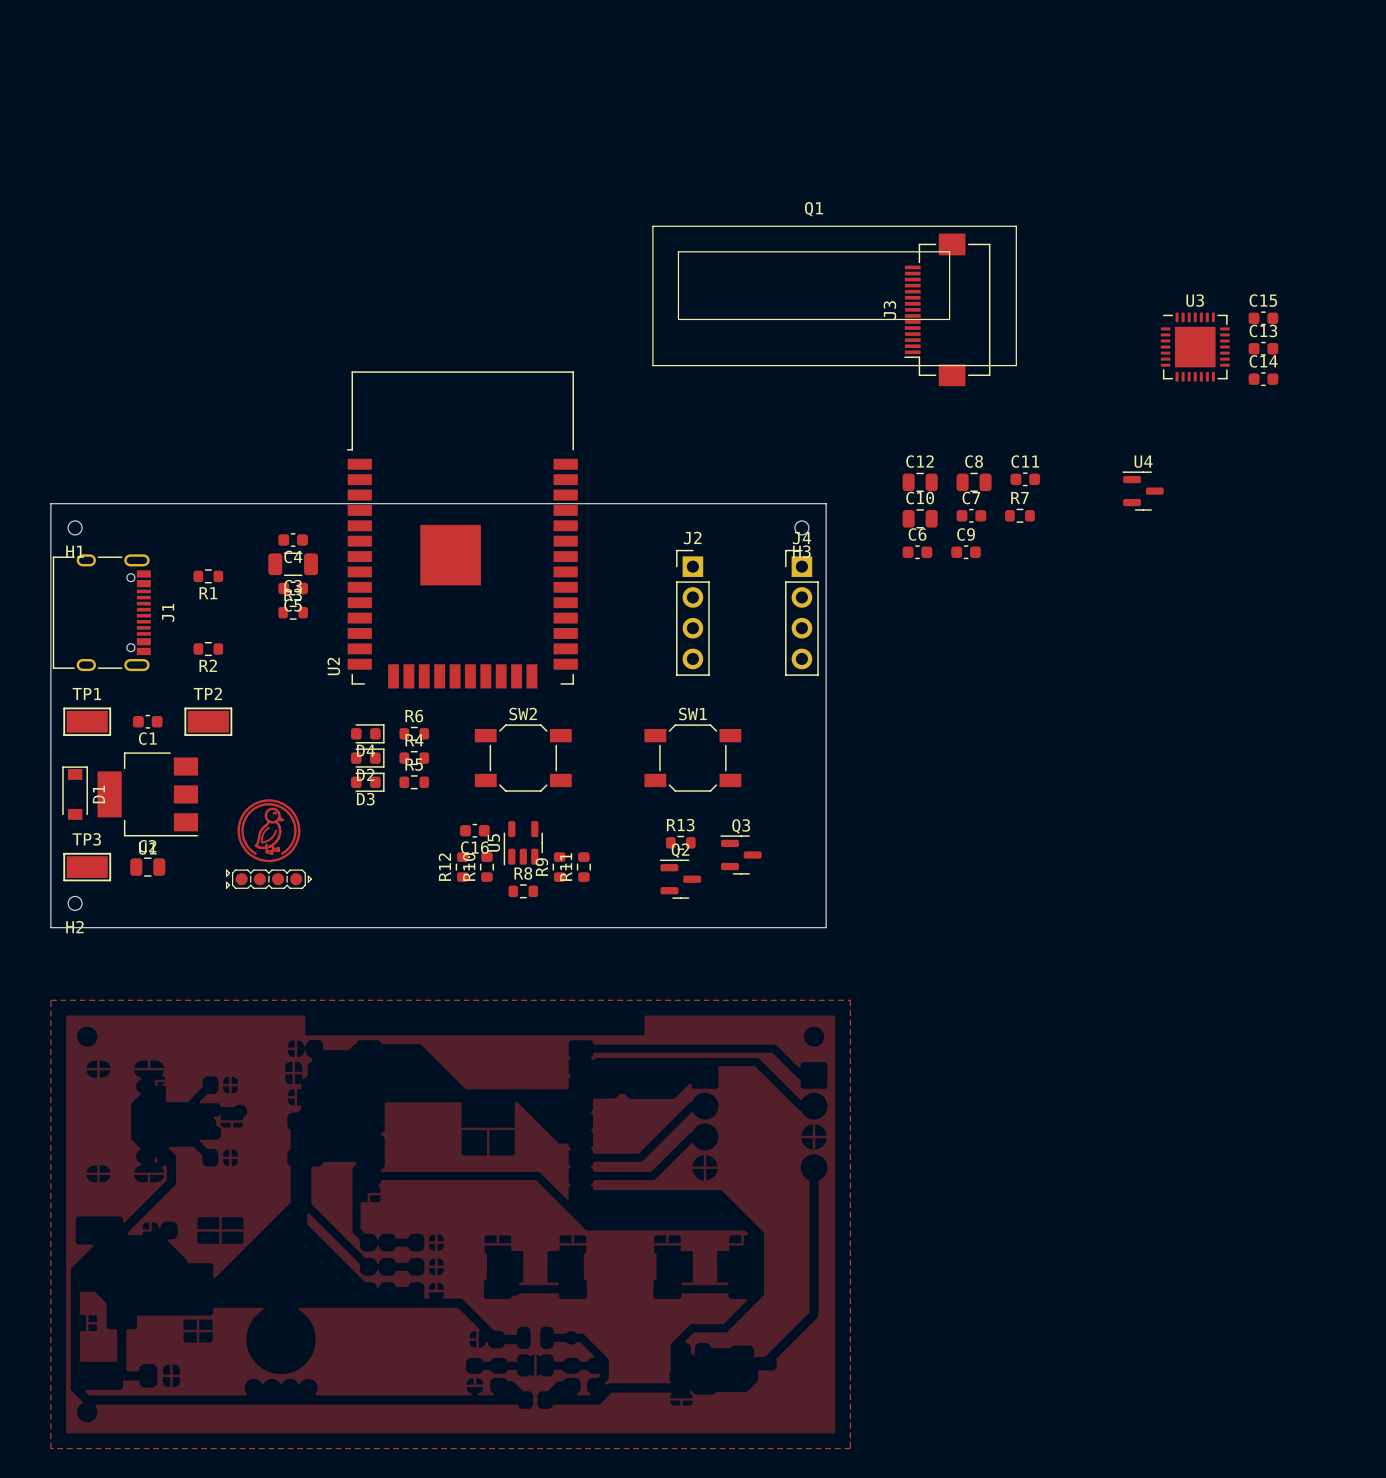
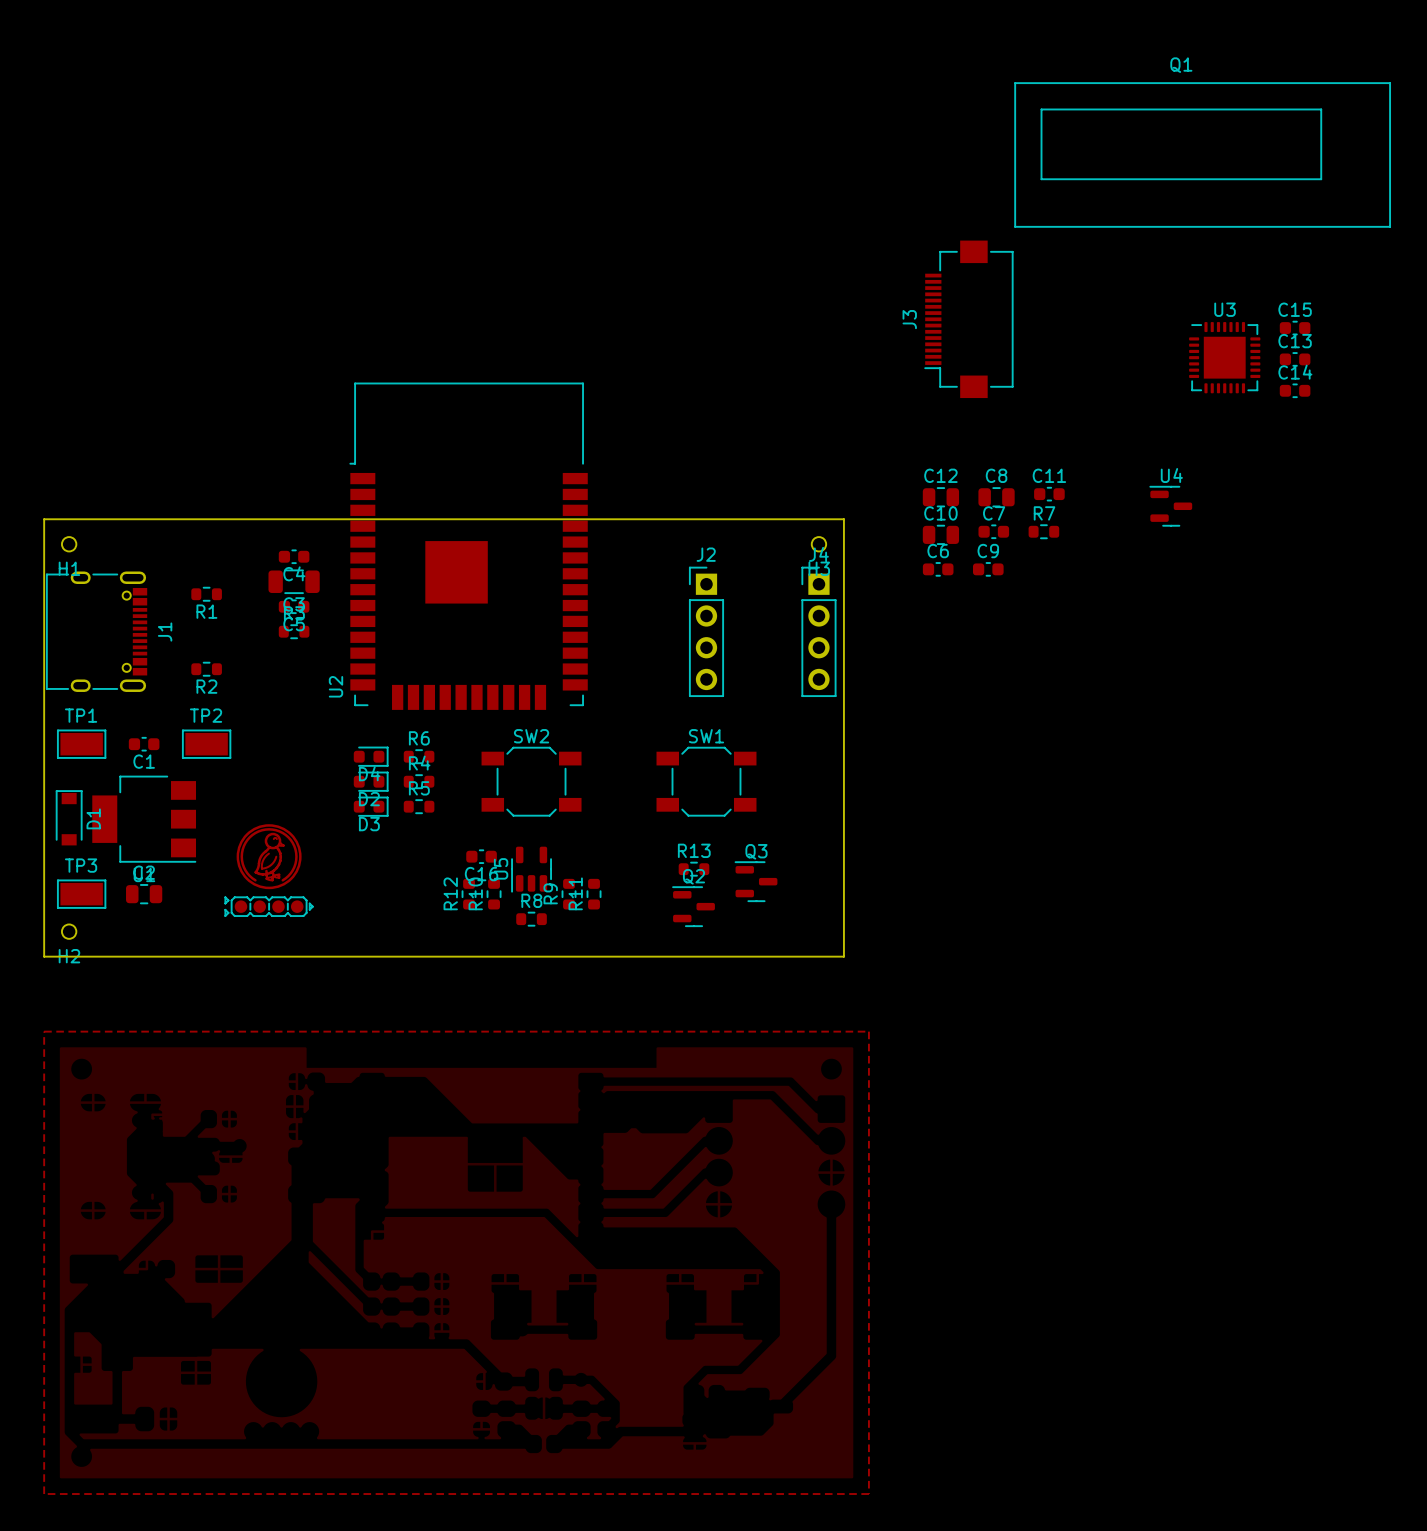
Q1 position: (834, 295) -> (1202, 154)

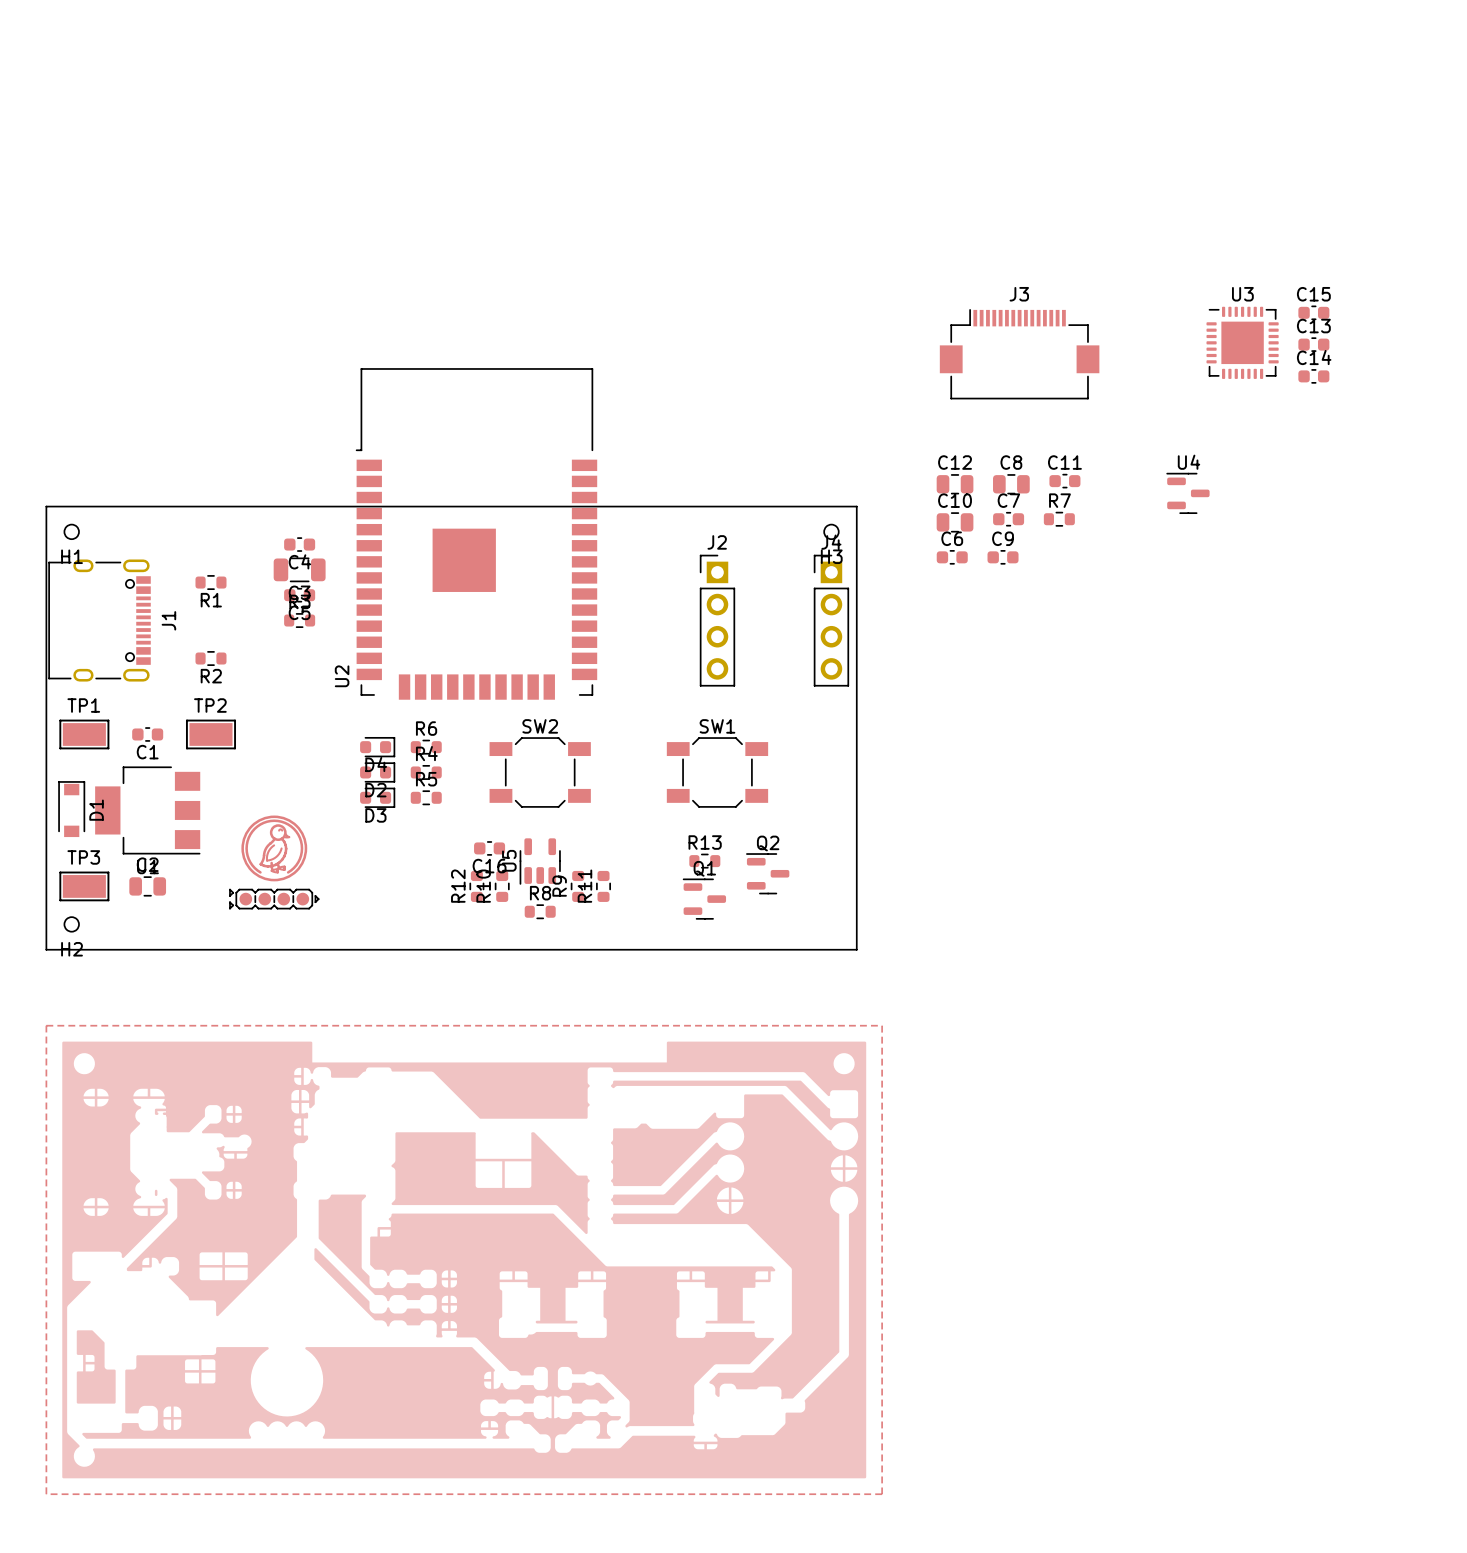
Q1: (1202, 154) -> none
J3 rotation: 0° (968, 319) -> 90° clockwise (1019, 354)
Q3 name: Q3 (756, 851) -> Q2 (768, 843)
Q2 name: Q2 (693, 876) -> Q1 (704, 868)

